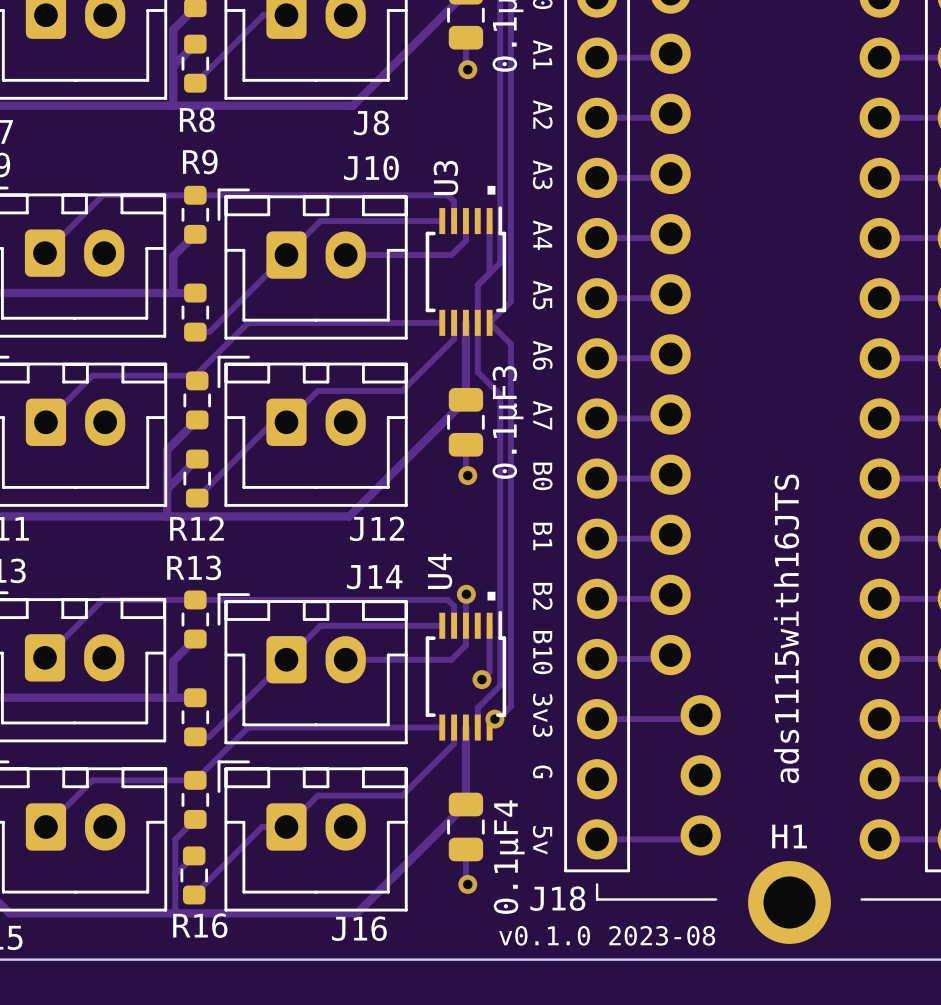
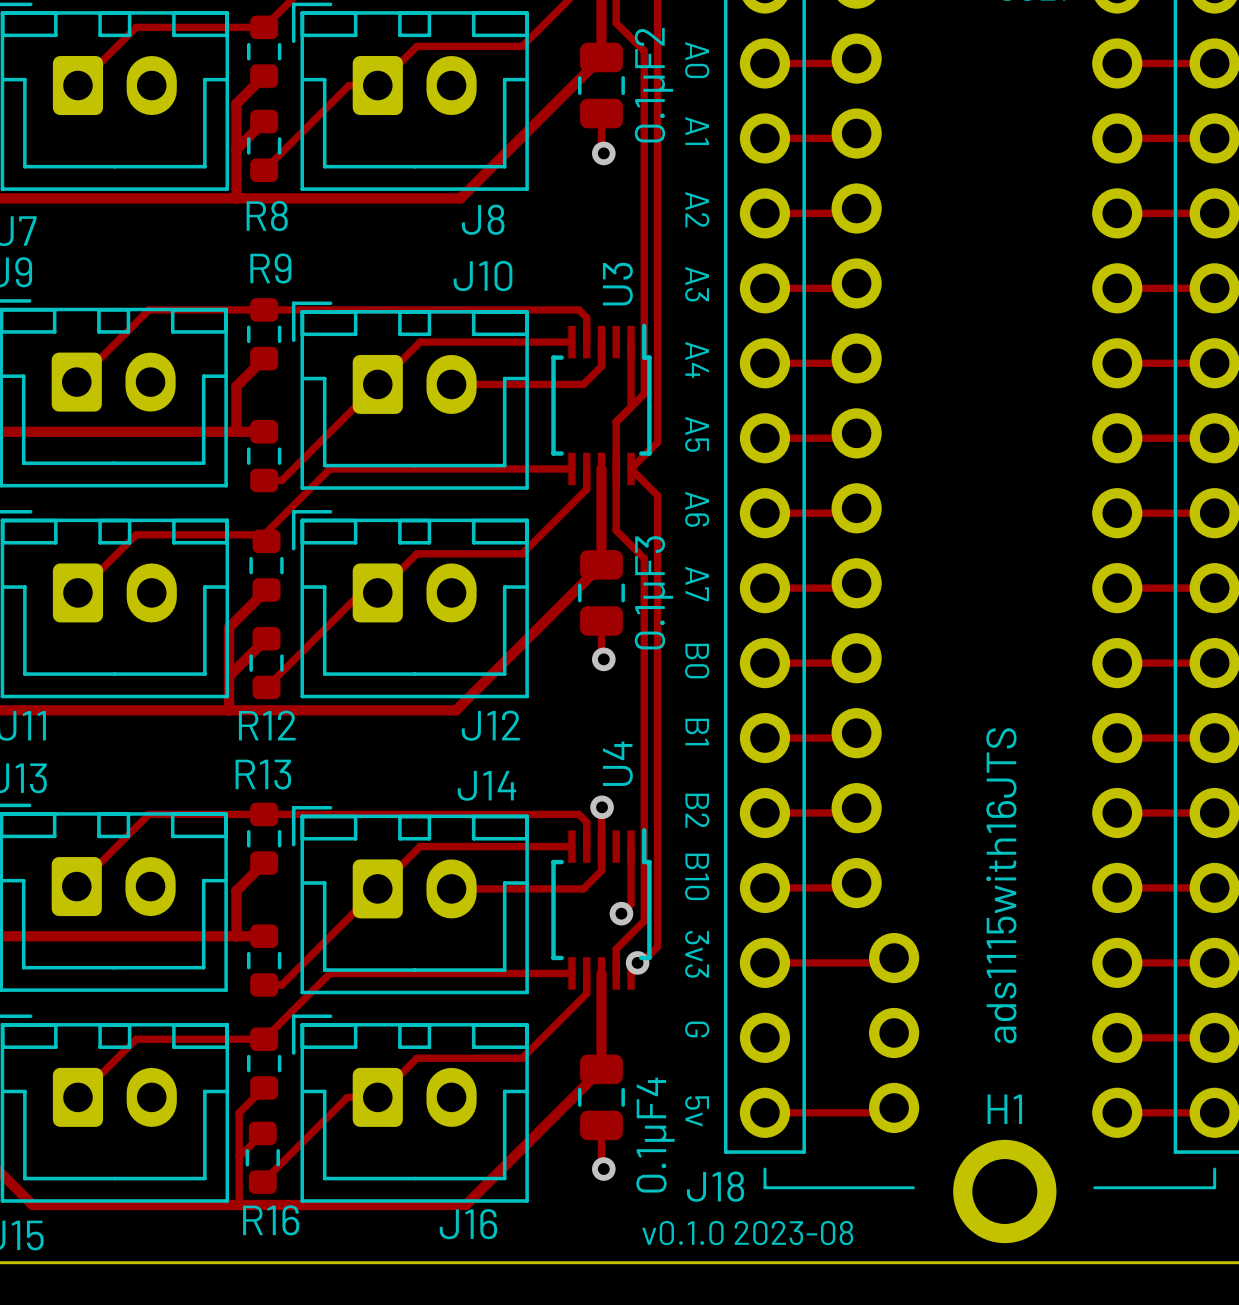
U3 name position: U3 (445, 177) -> U3 (617, 284)
text: . (491, 190) -> none
U4 name position: U4 (440, 571) -> U4 (617, 763)
text: . (491, 596) -> none

